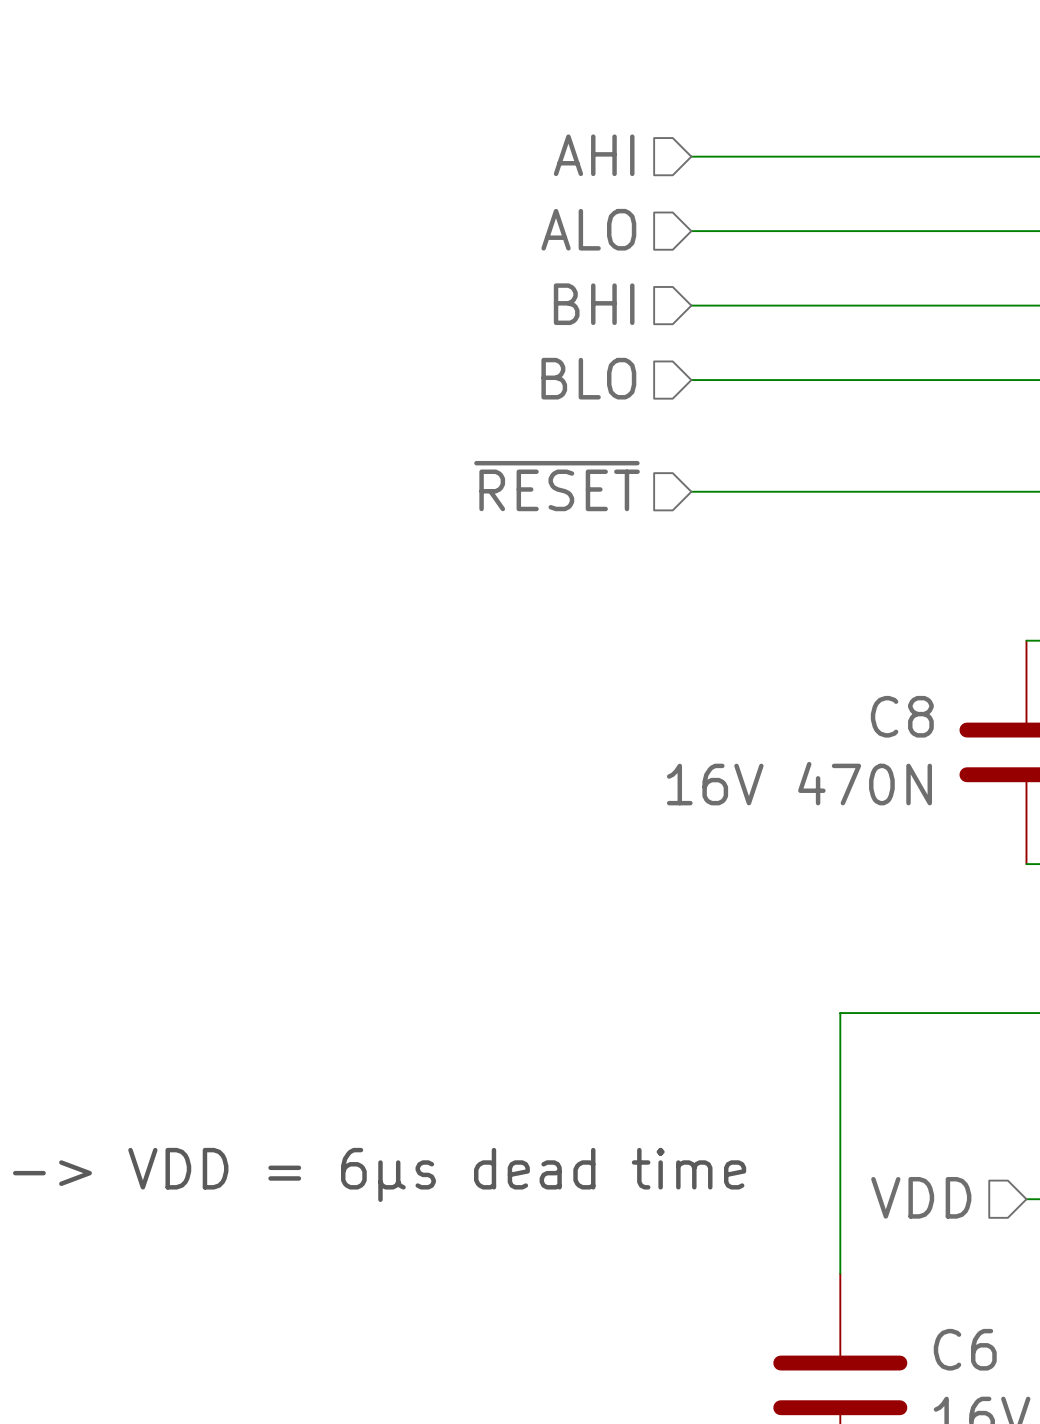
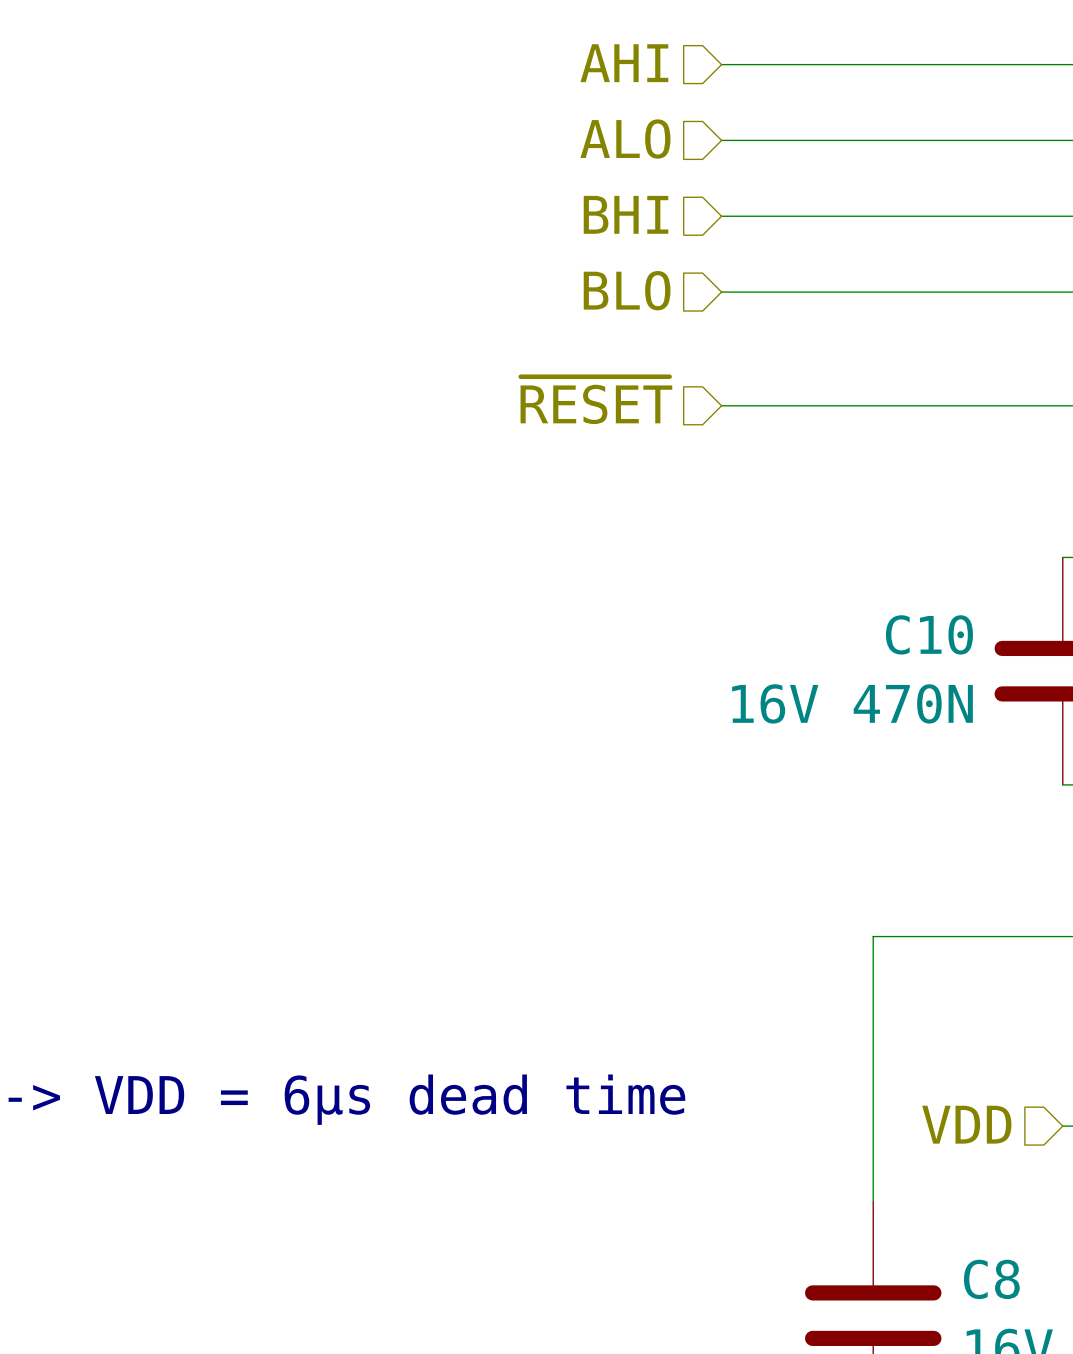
C8 name: C8 (902, 716) -> C10 (929, 634)
C6 name: C6 (965, 1349) -> C8 (991, 1279)

